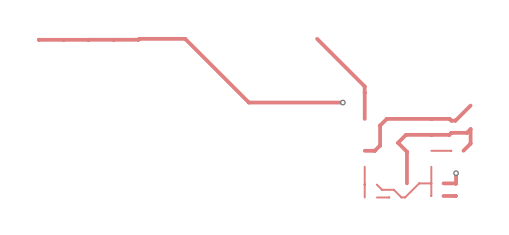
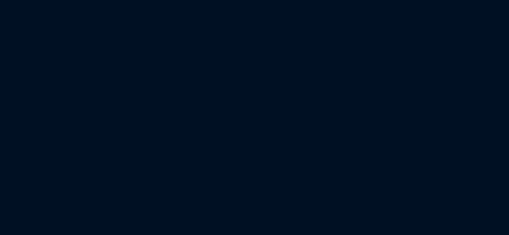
track: (317, 38) (364, 86) (364, 118) -> none
track: (38, 39) (185, 38) (248, 102) (342, 102) -> none
via: (342, 102) -> none
track: (470, 105) (455, 120) (449, 118) (386, 118) (380, 125) (380, 145) (374, 150) (364, 150) -> none
track: (431, 150) (451, 150) -> none
track: (463, 150) (470, 143) (470, 129) (466, 132) (451, 132) (449, 134) (406, 134) (398, 142) (406, 151) (406, 183) -> none
track: (364, 166) (364, 184) -> none
track: (431, 166) (431, 195) -> none
track: (456, 173) (455, 183) (443, 183) -> none
via: (456, 173) -> none
track: (431, 183) (419, 183) (405, 197) (401, 197) (393, 189) (382, 189) (376, 184) -> none
track: (364, 184) (364, 197) -> none
track: (455, 195) (443, 195) -> none
track: (376, 197) (389, 197) -> none

